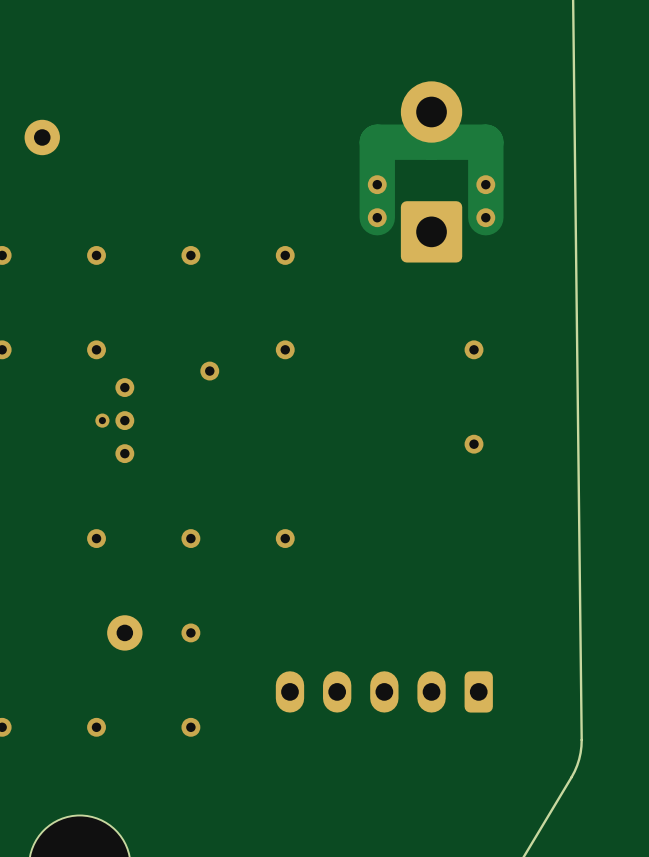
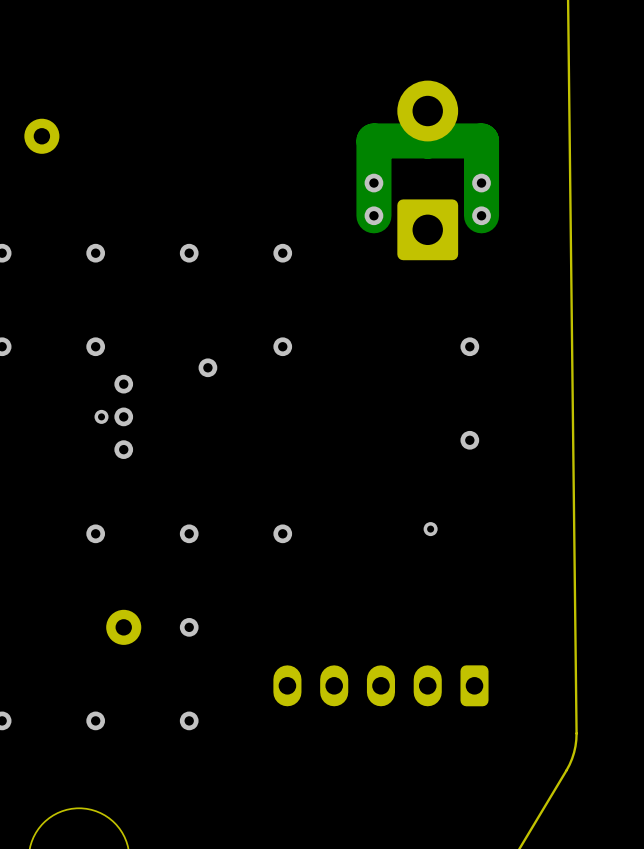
via: none -> (430, 529)

